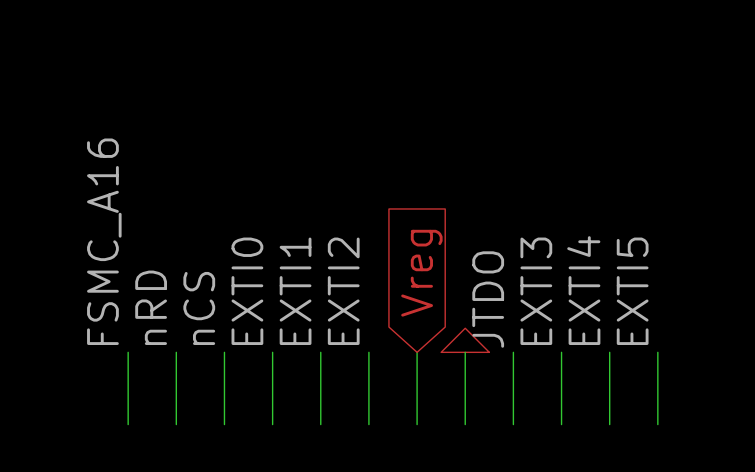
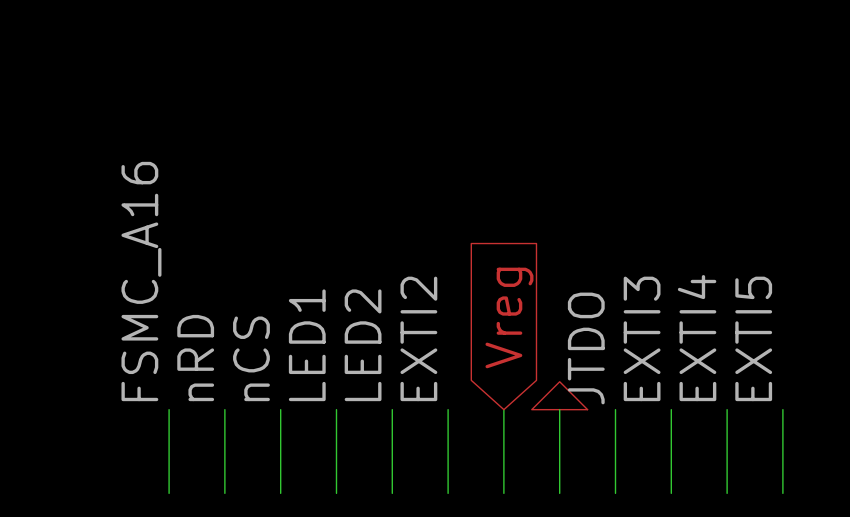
label: EXTI0 (247, 291) -> LED1 (307, 345)
label: EXTI1 (295, 291) -> LED2 (363, 345)

